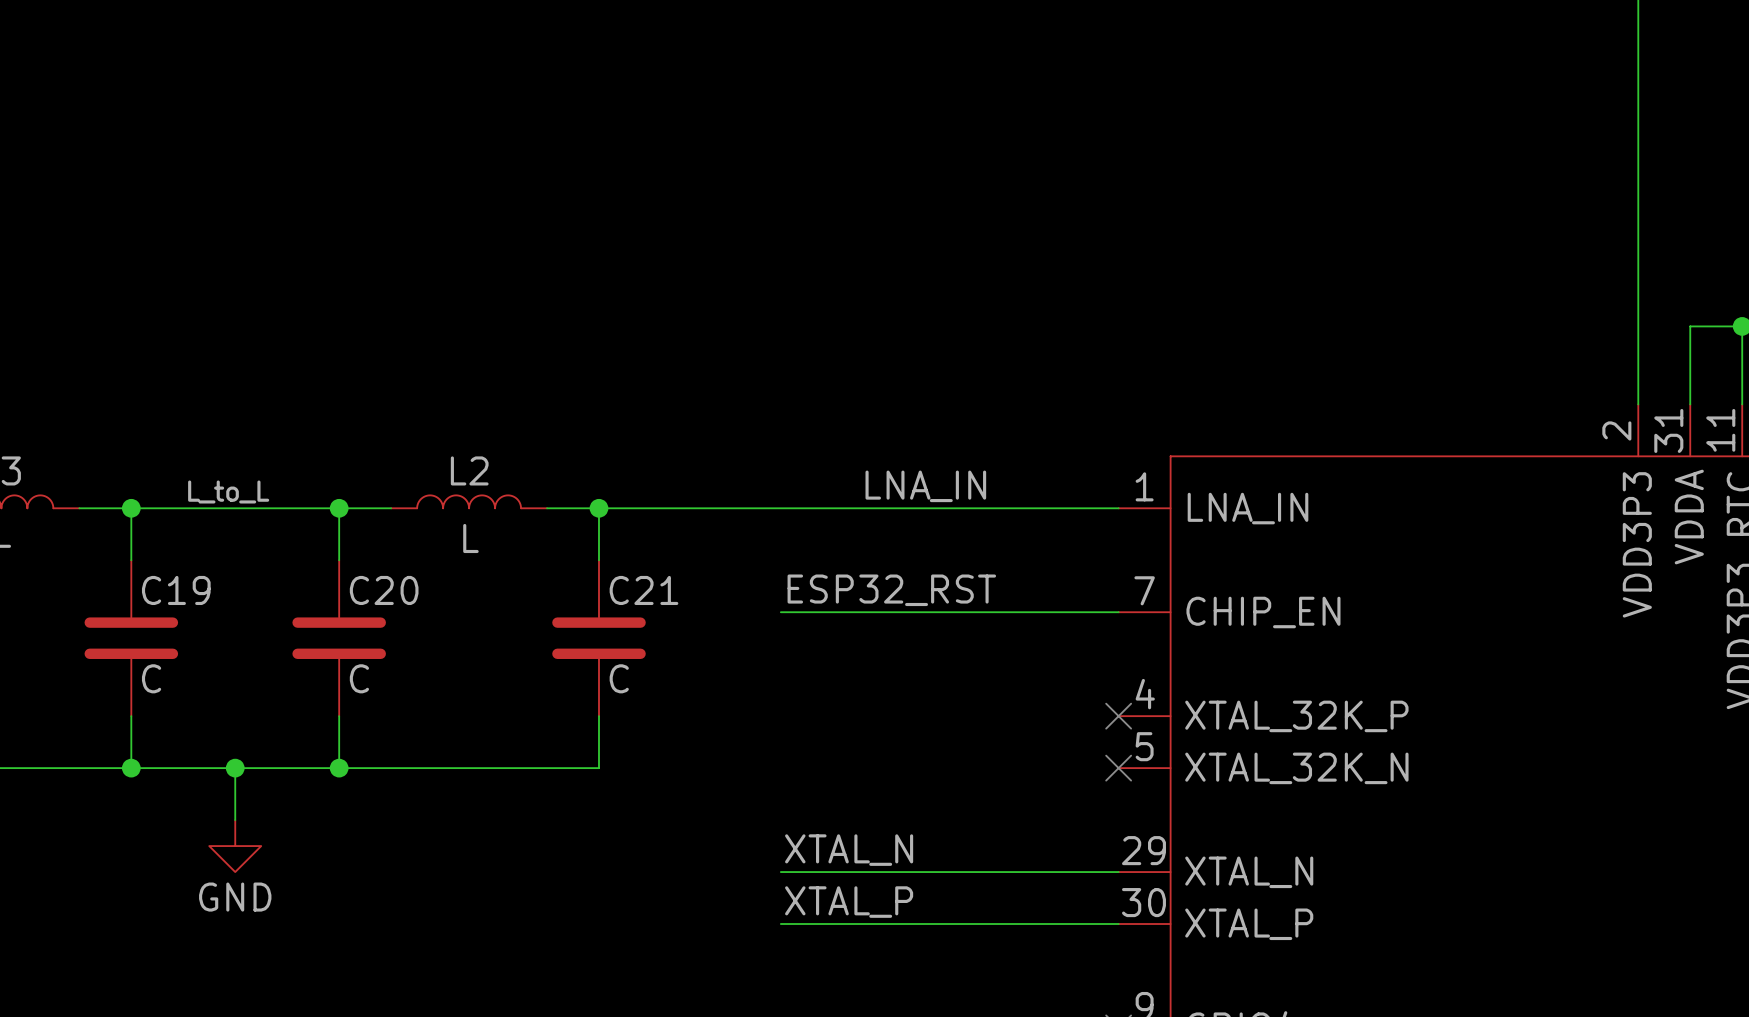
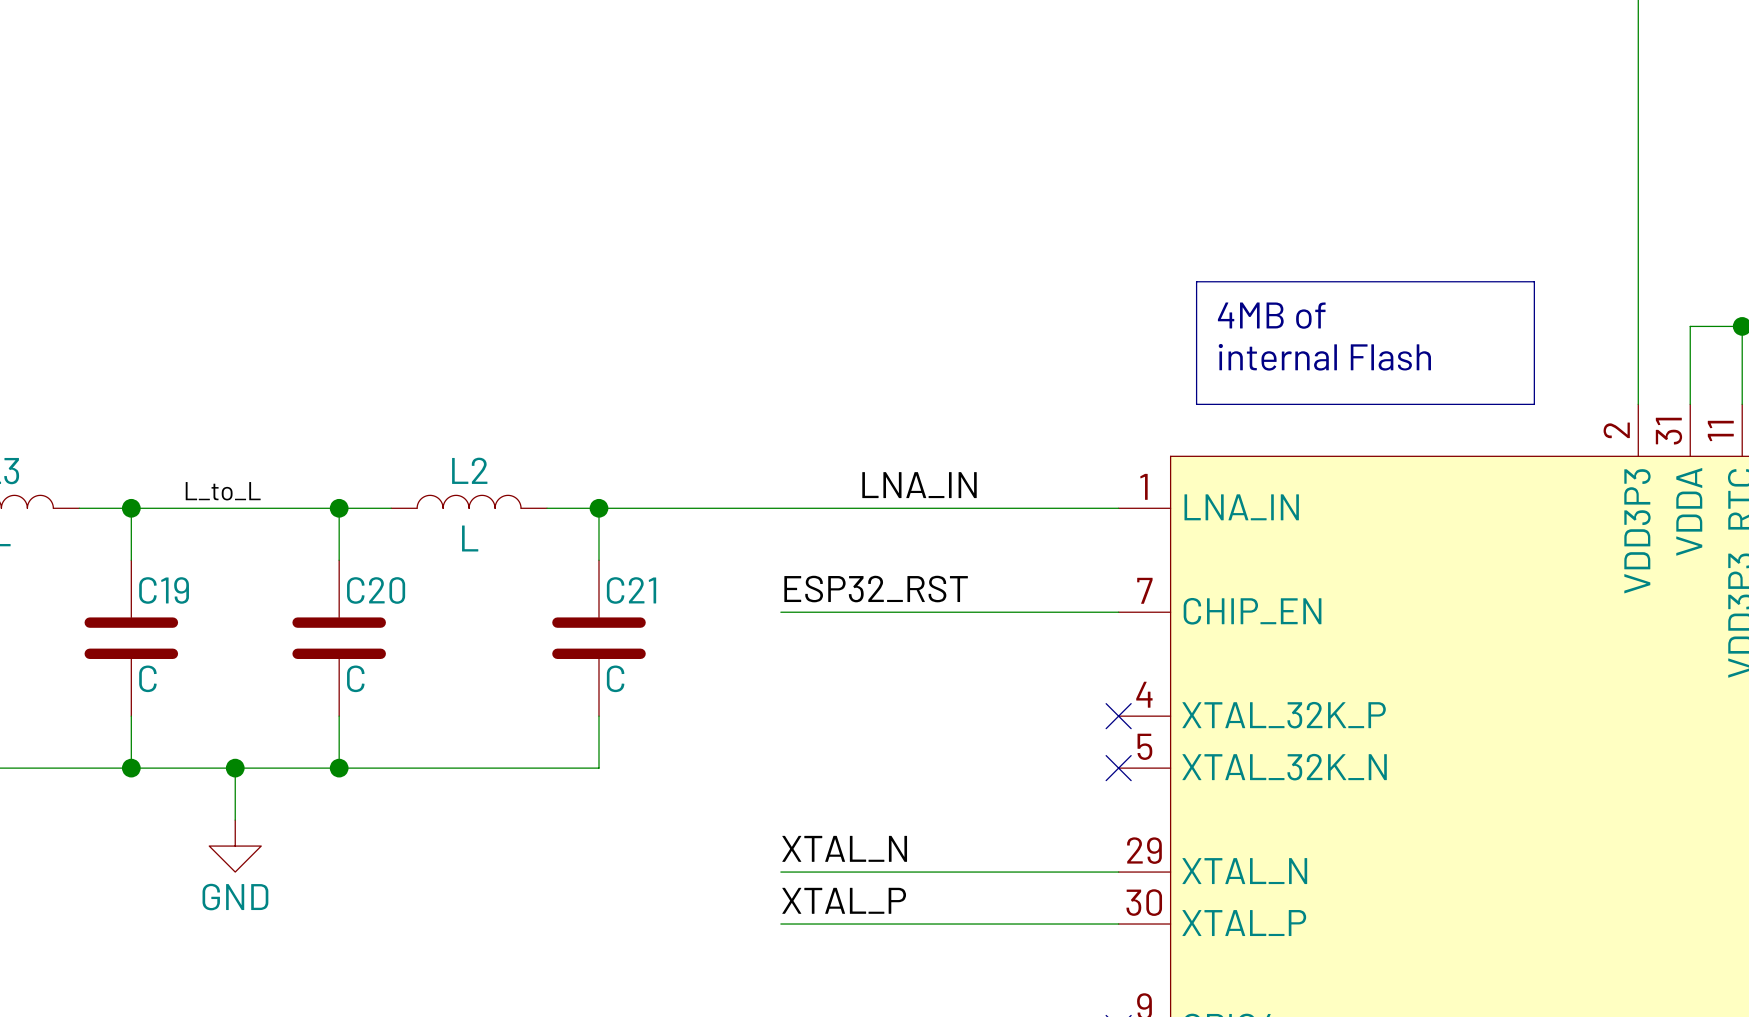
line: none -> (1196, 281) (1534, 281) (1534, 404) (1196, 404) (1196, 281)
text: none -> 4MB of (1271, 315)
text: none -> internal Flash (1324, 357)

